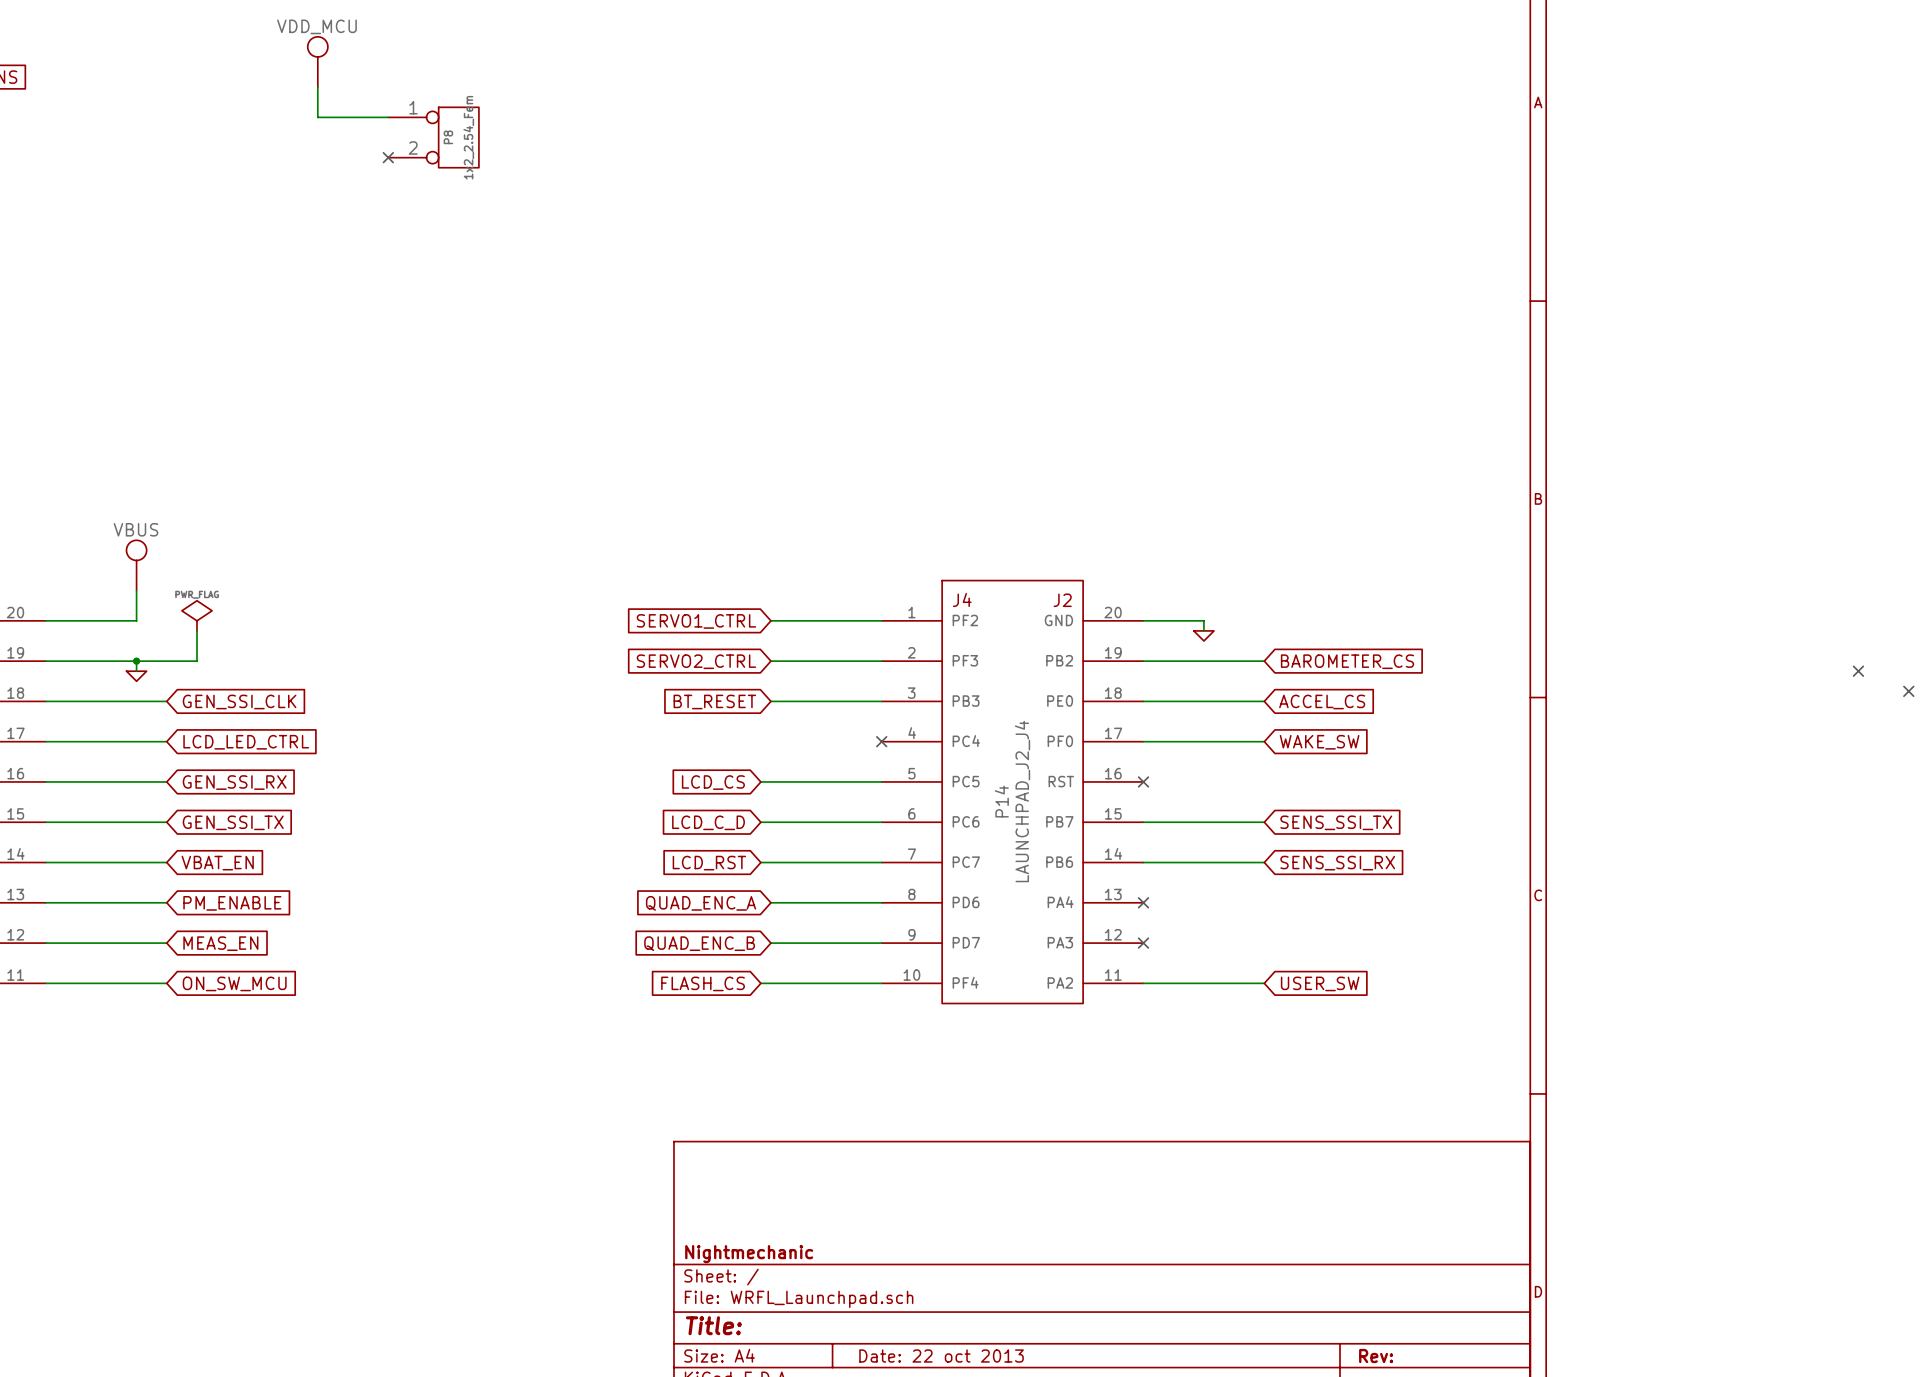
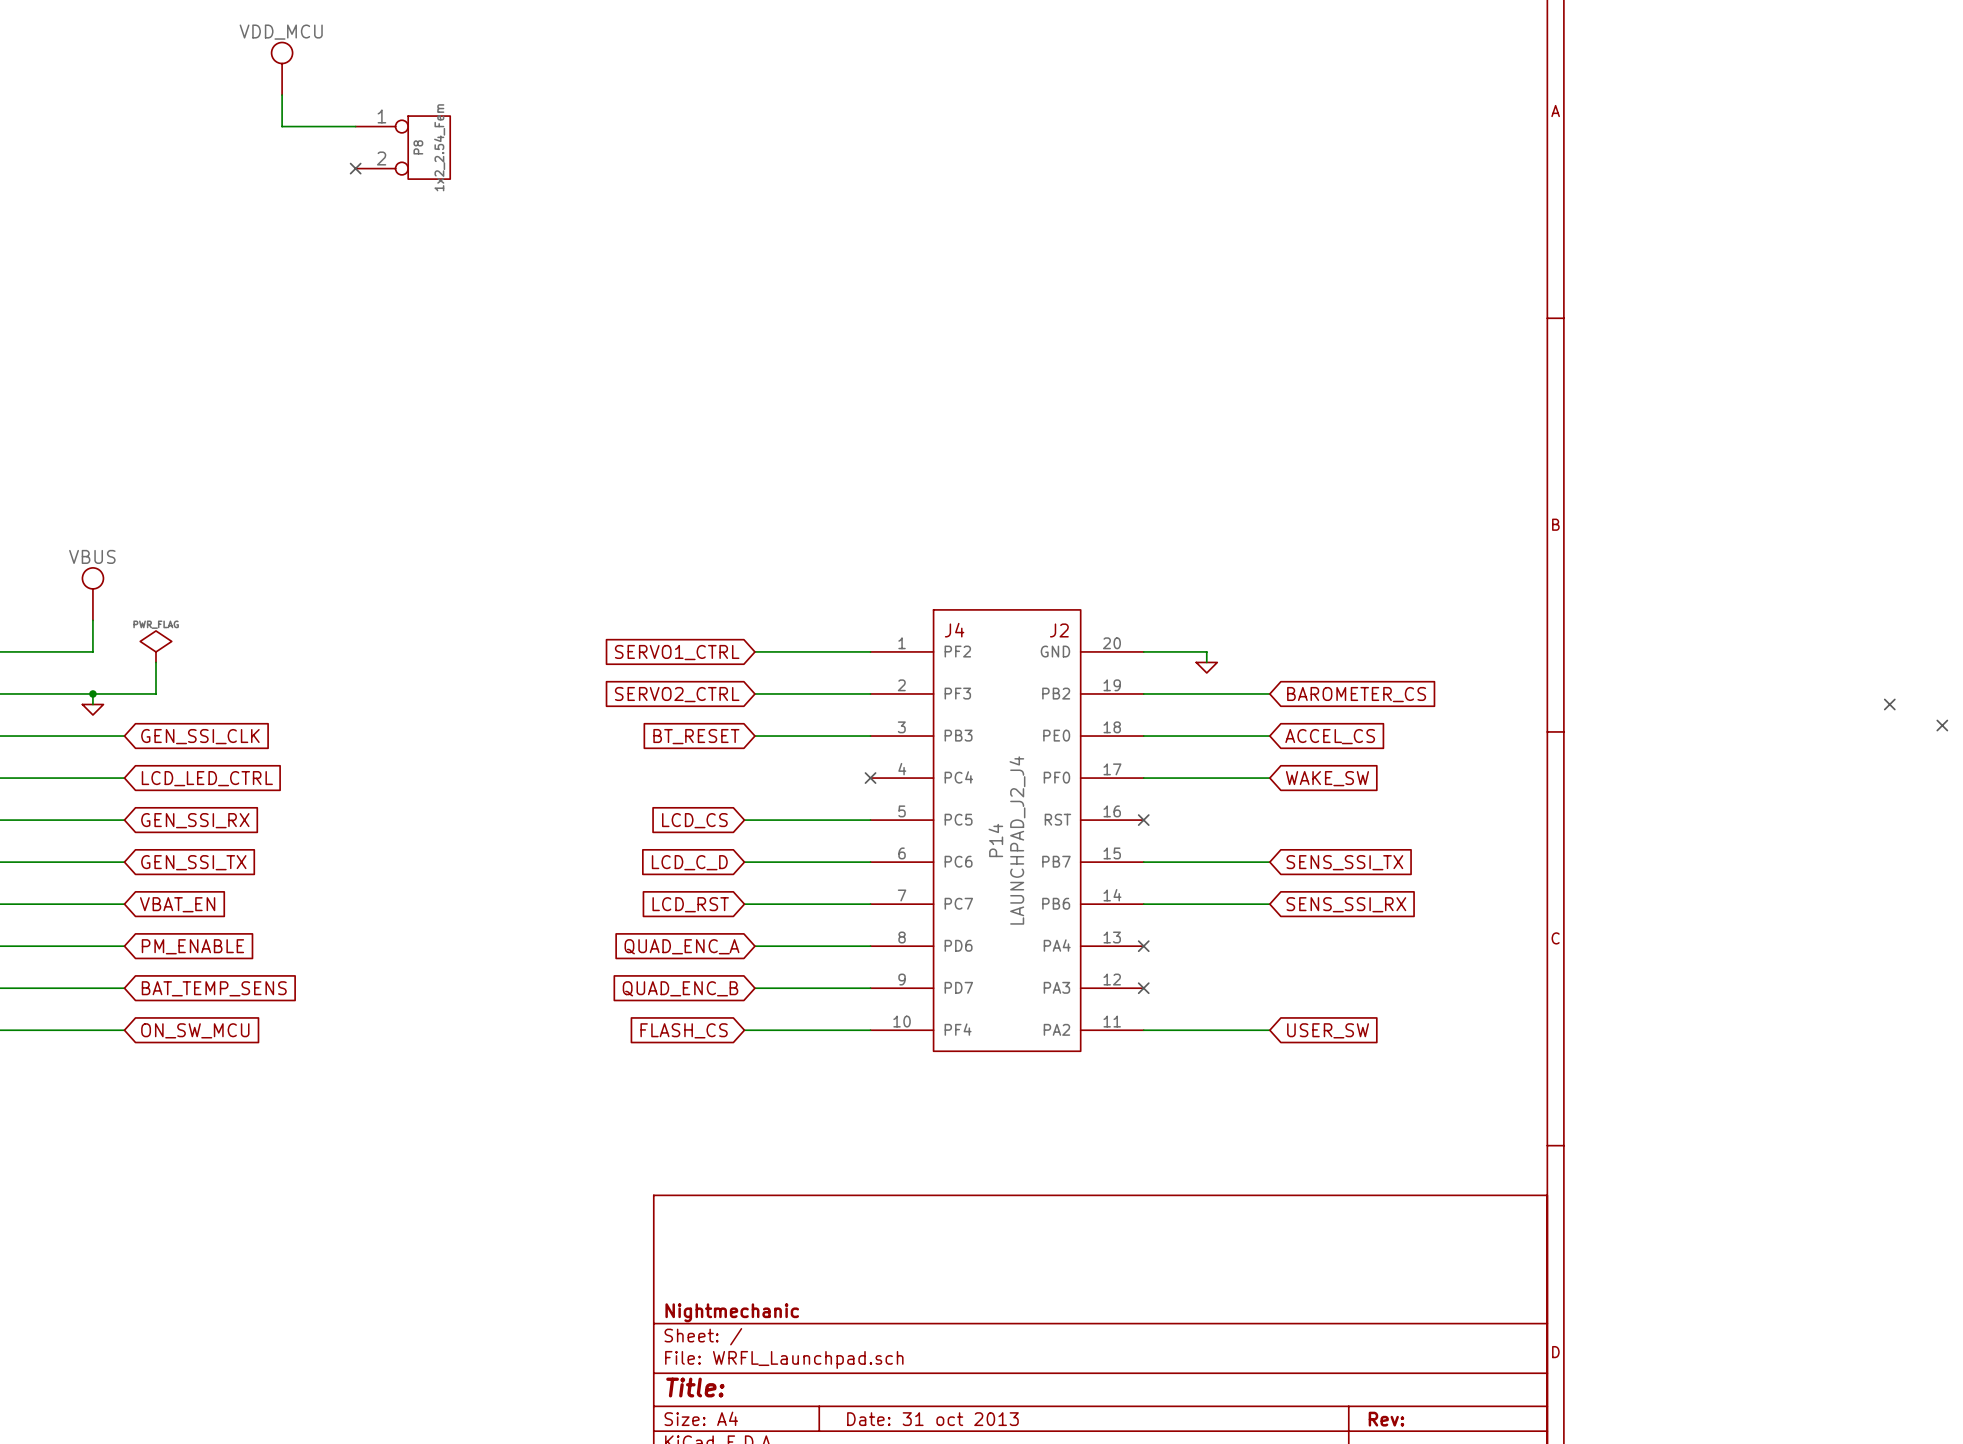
global label: MEAS_EN (220, 943) -> BAT_TEMP_SENS (214, 988)
title block: Date: 22 oct 2013 (941, 1356) -> Date: 31 oct 2013 (932, 1419)

